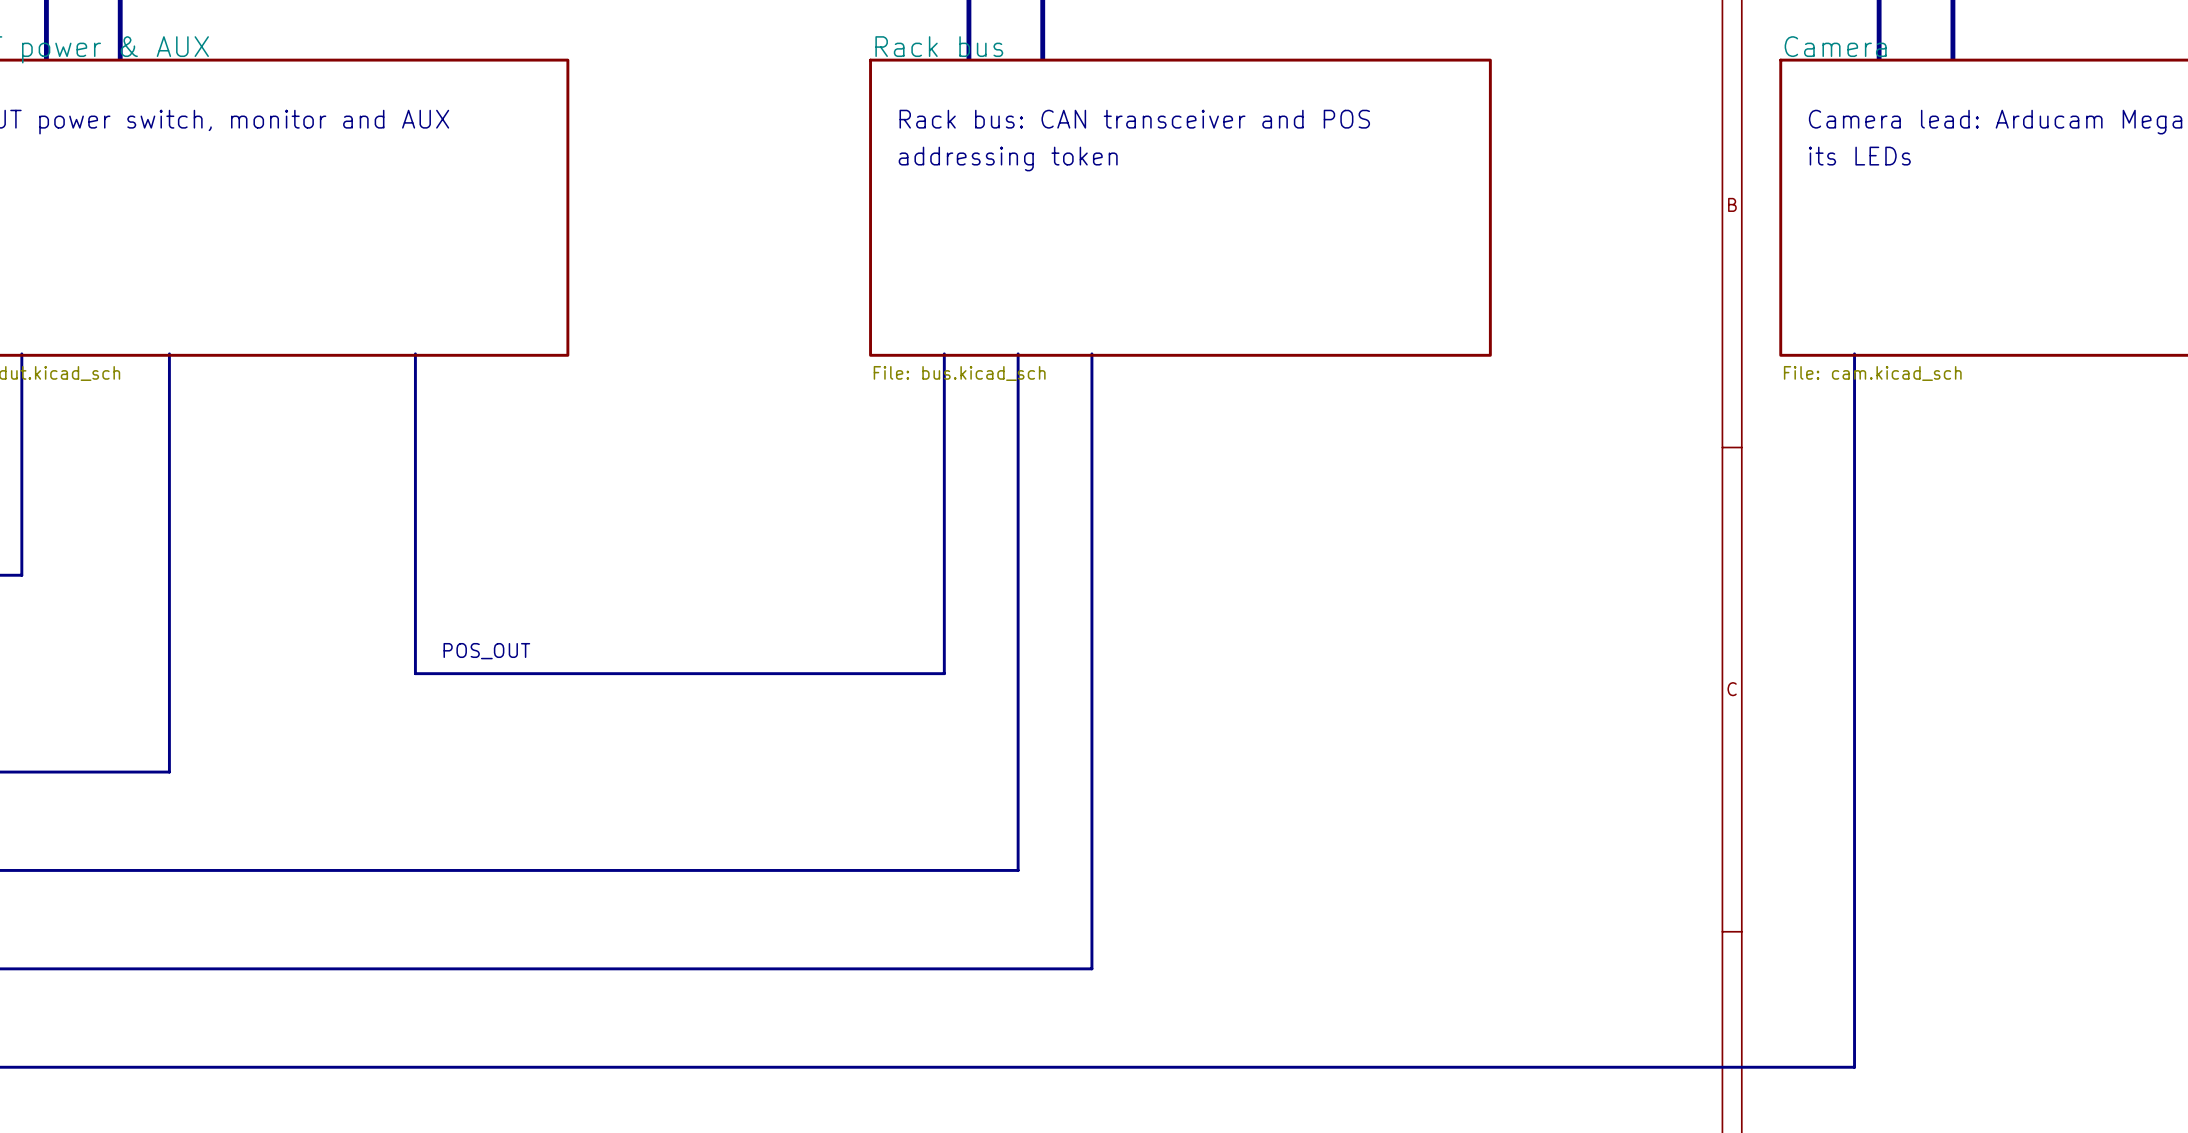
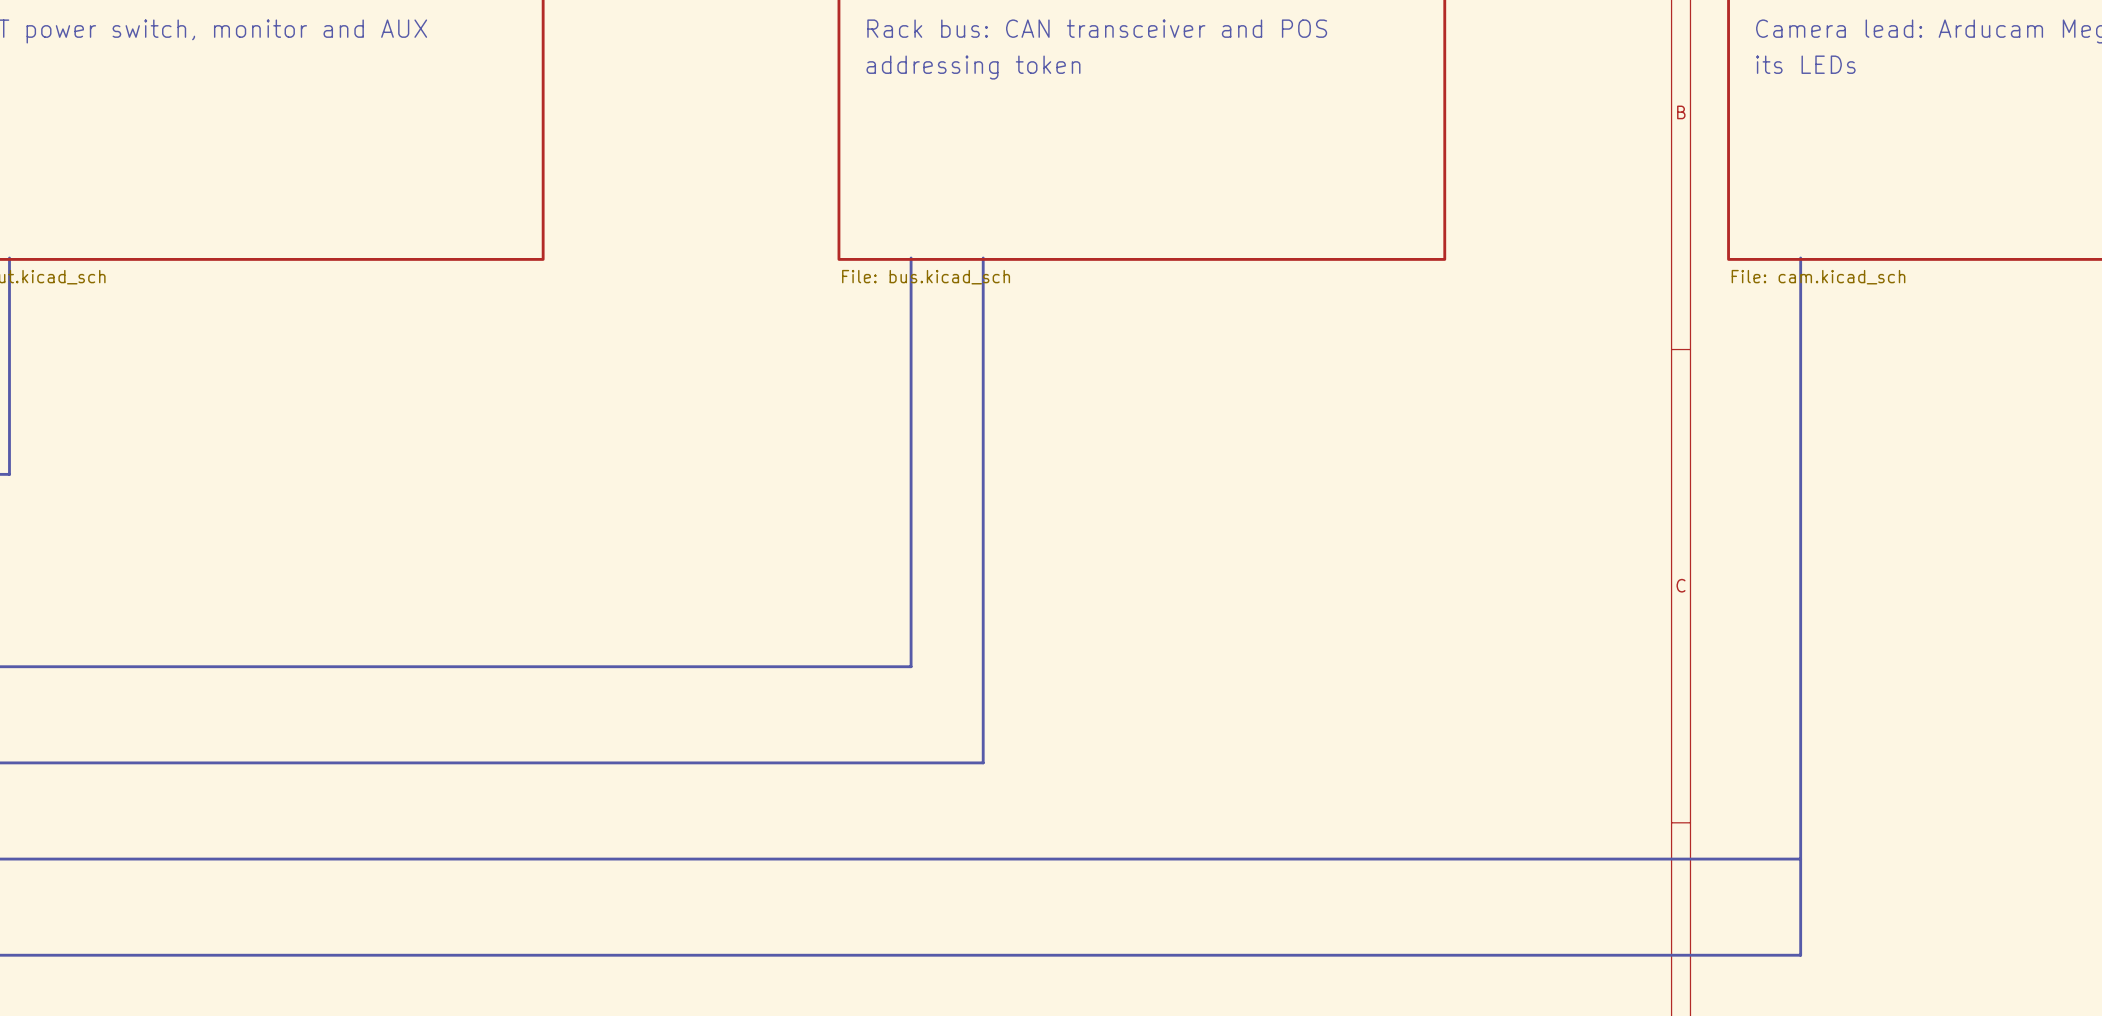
line: (169, 353) (169, 772) -> none
line: (415, 353) (415, 673) (944, 673) -> (153, 666) (911, 666) (911, 570)
line: (1091, 353) (1091, 968) -> (1800, 859) (1055, 859)
text: POS_OUT (486, 651) -> none

